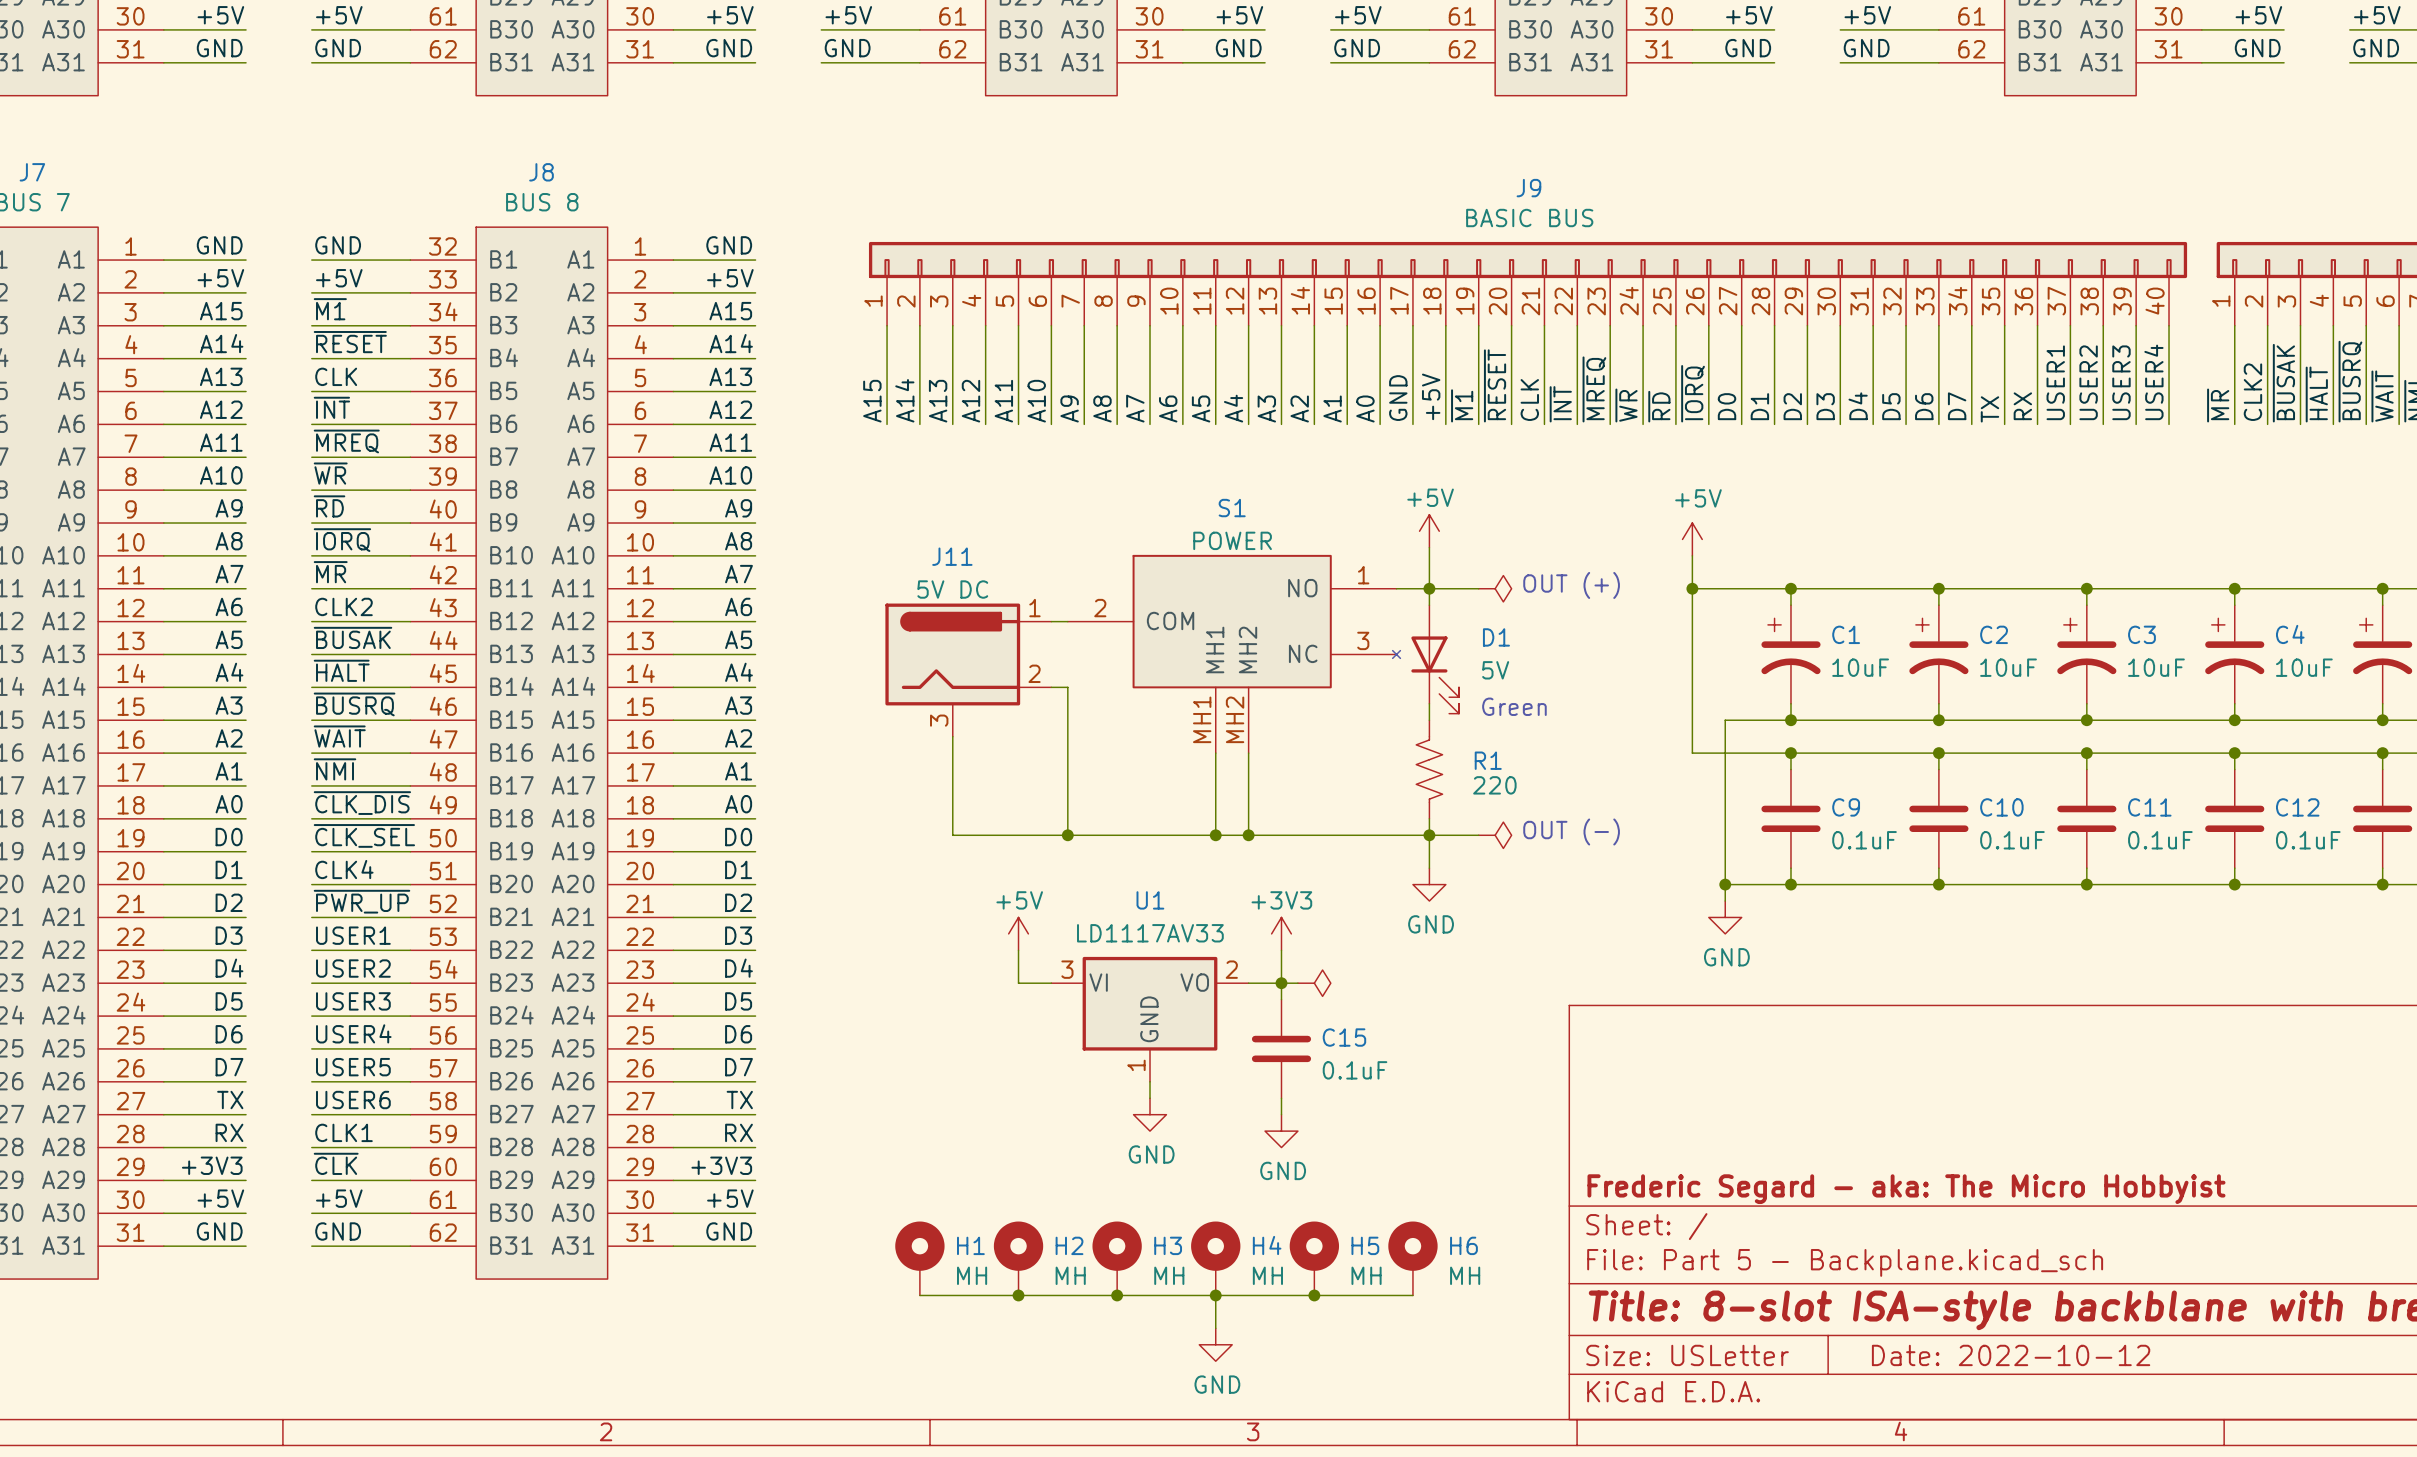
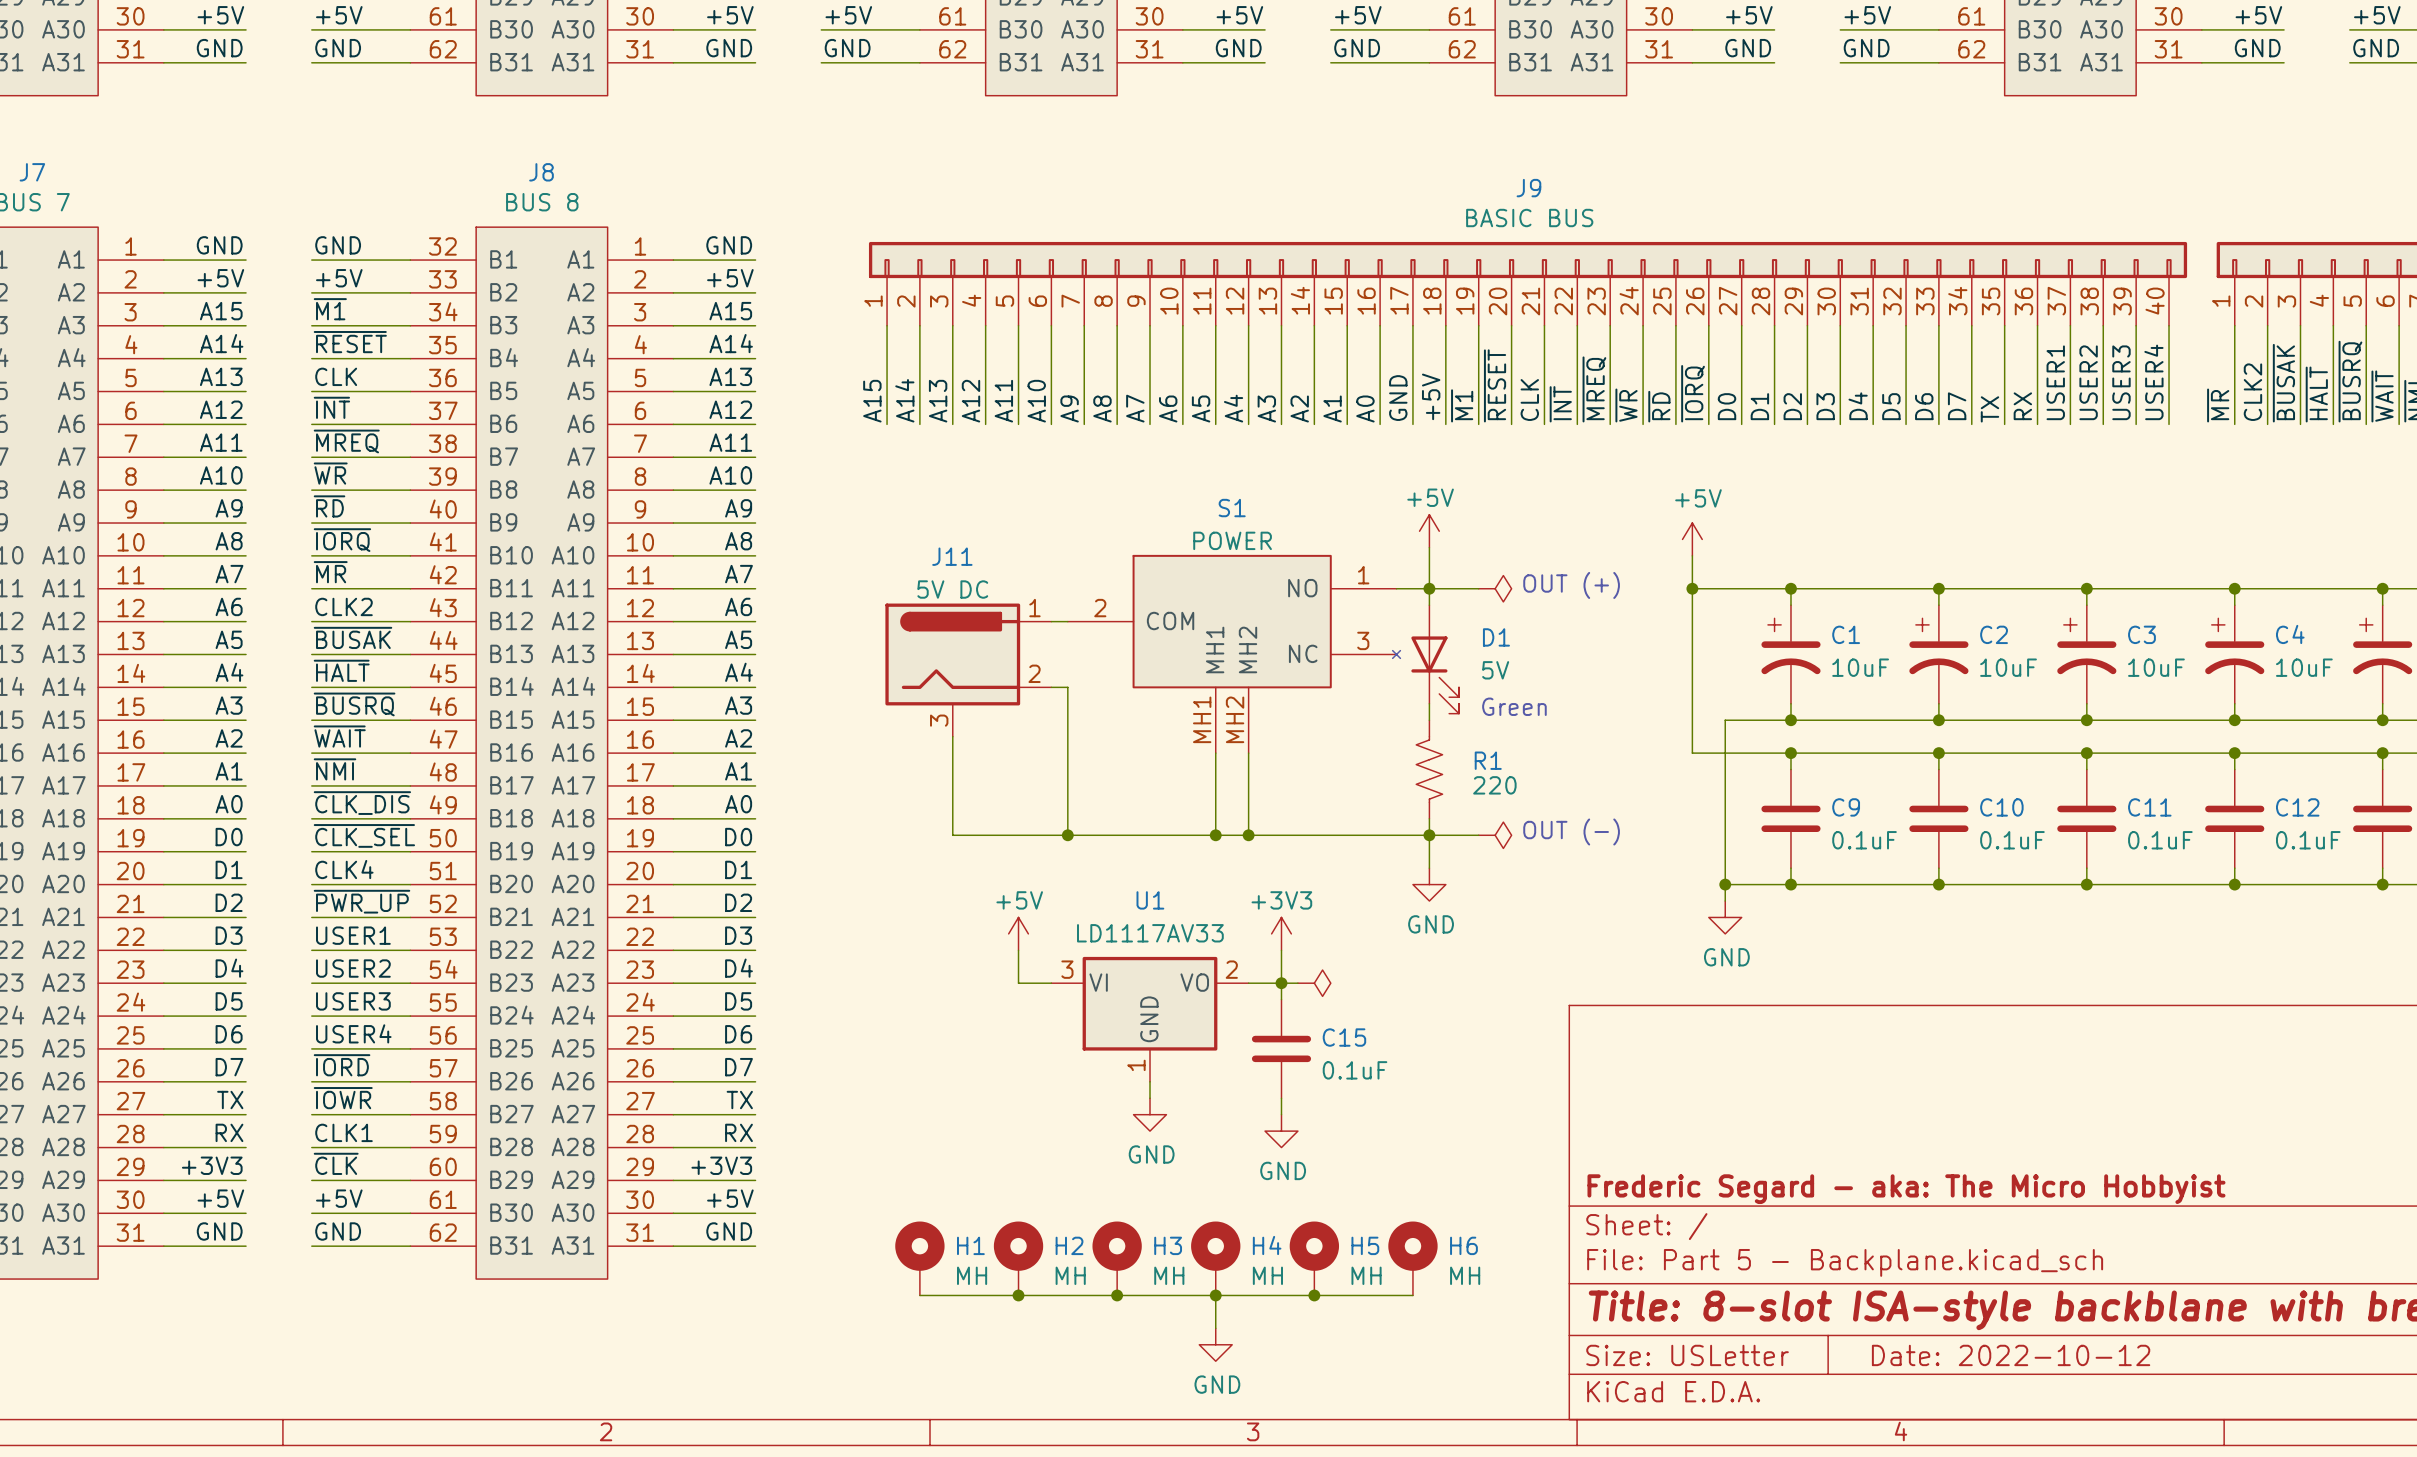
label: USER5 (353, 1067) -> ~{IORD} (342, 1065)
label: USER6 (353, 1100) -> ~{IOWR} (343, 1098)

